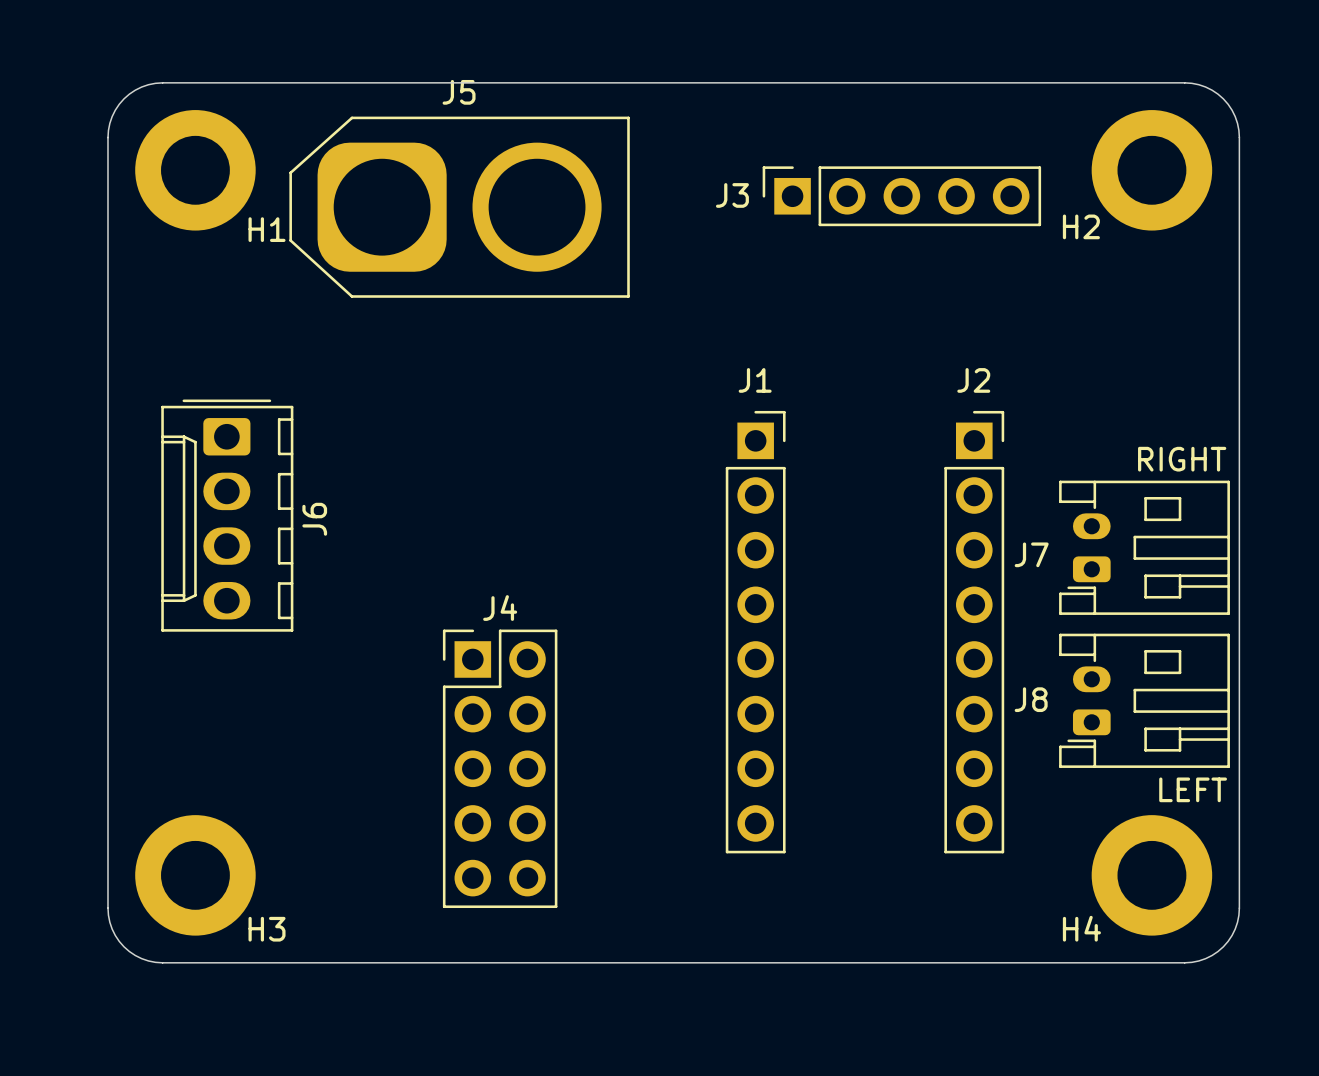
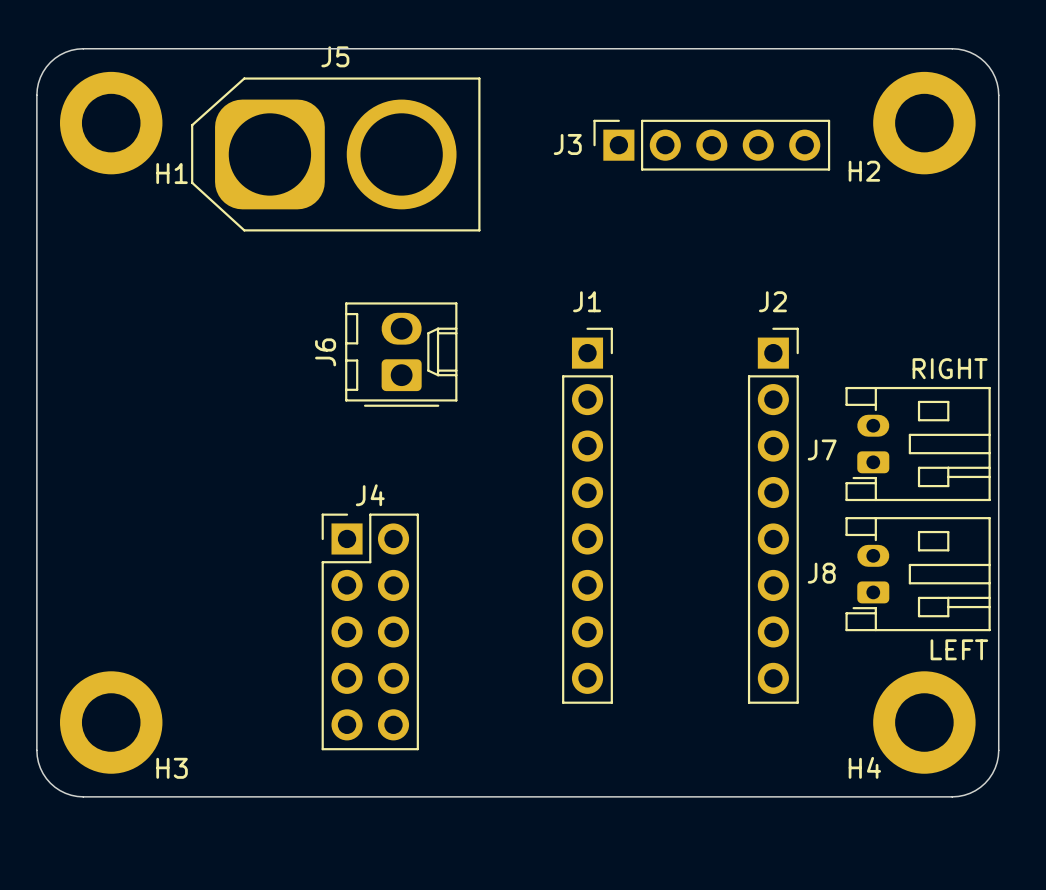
J6 footprint: [161, 399, 294, 632] -> [345, 302, 458, 407]
J6 name position: J6 (314, 519) -> J6 (325, 352)

